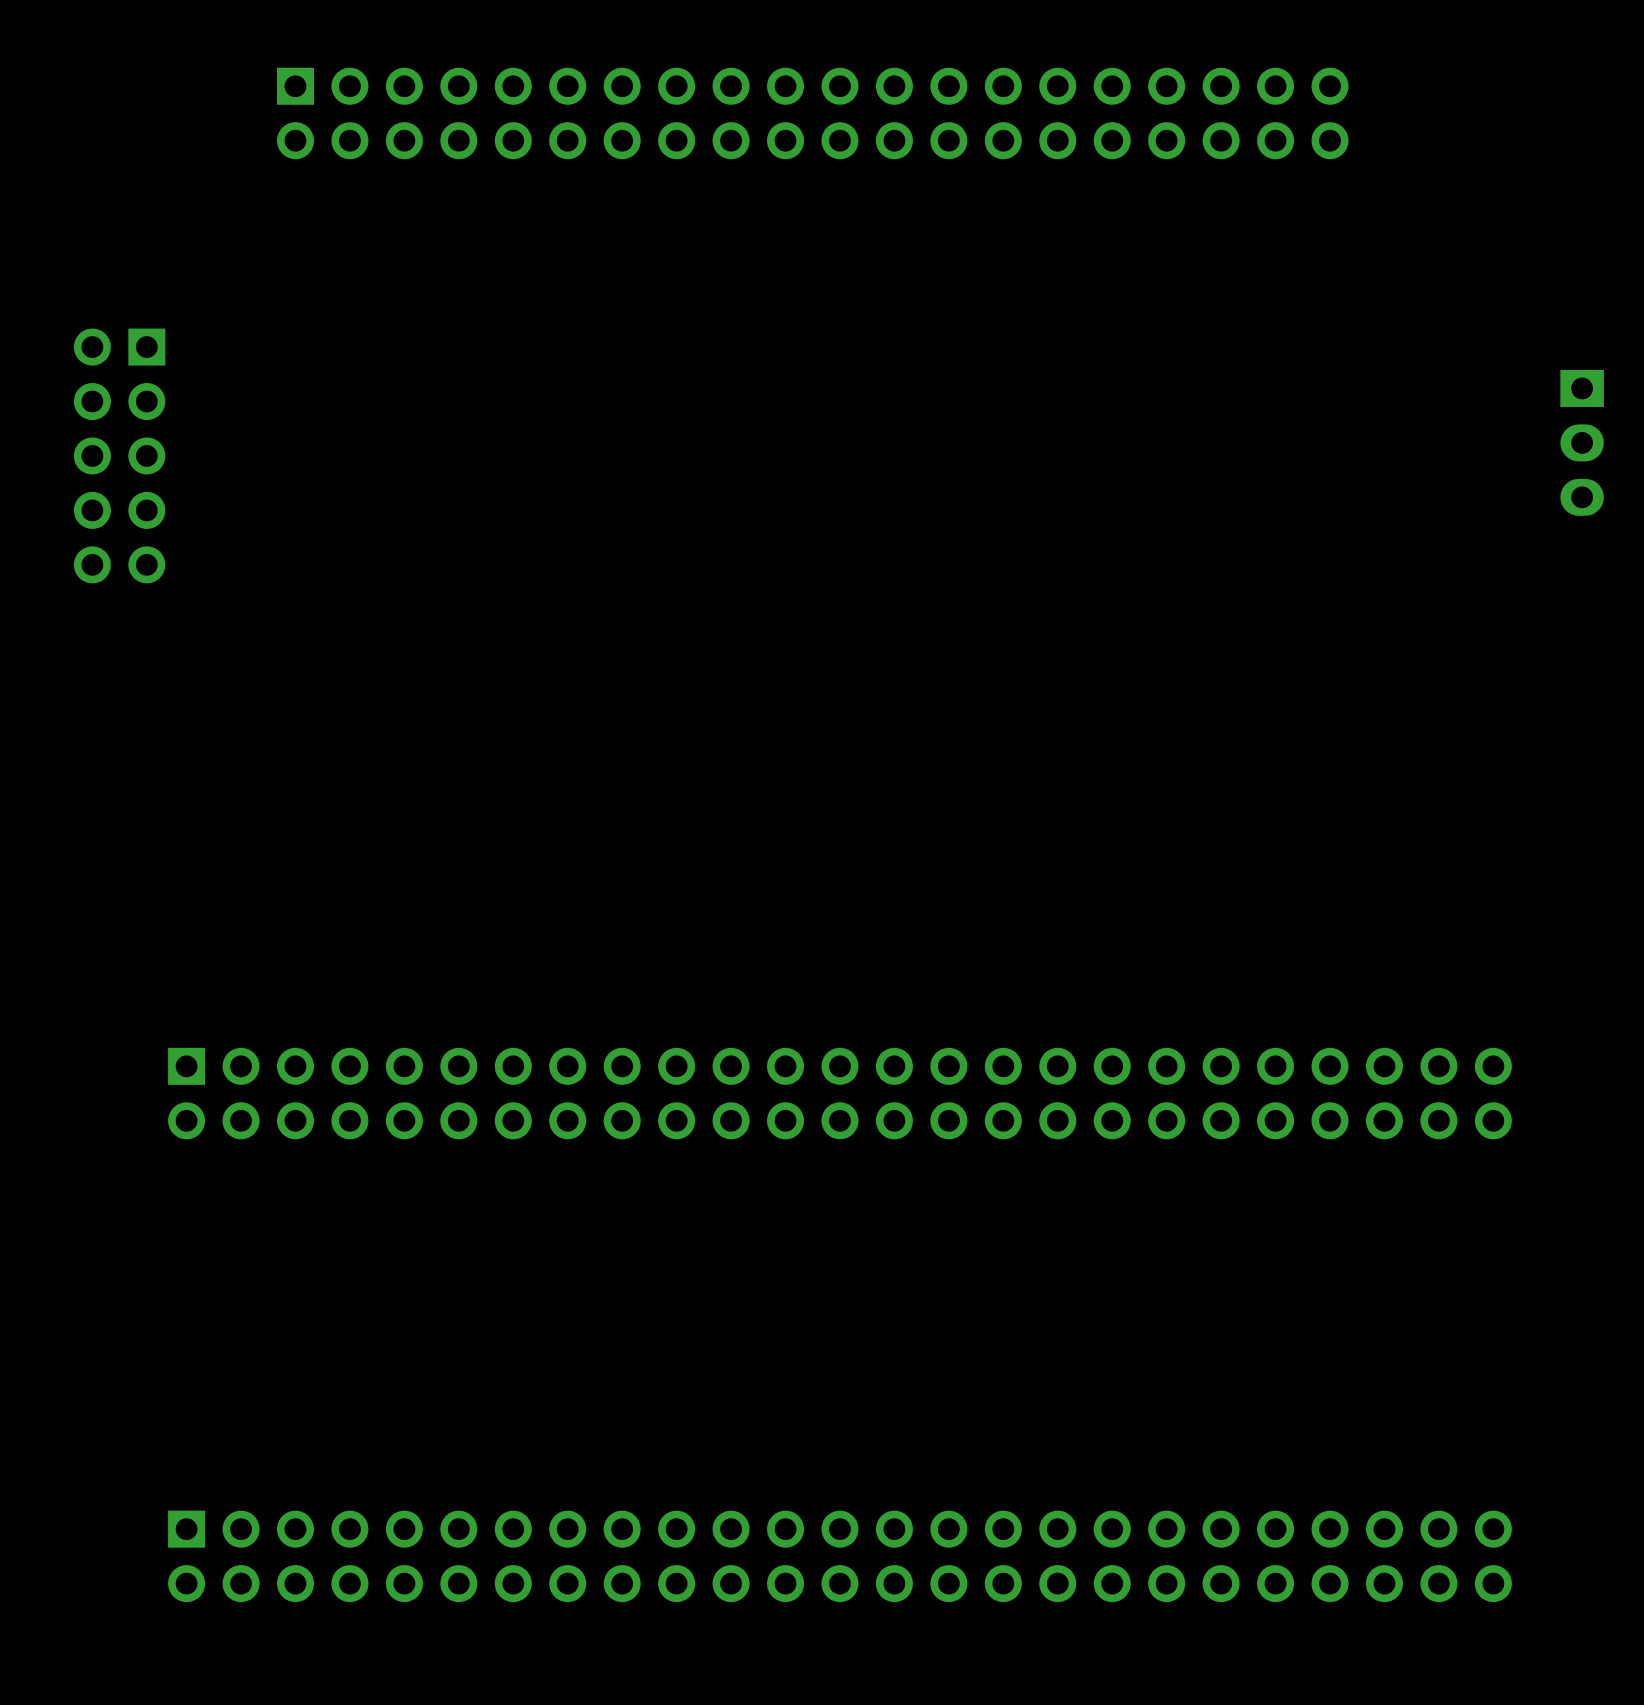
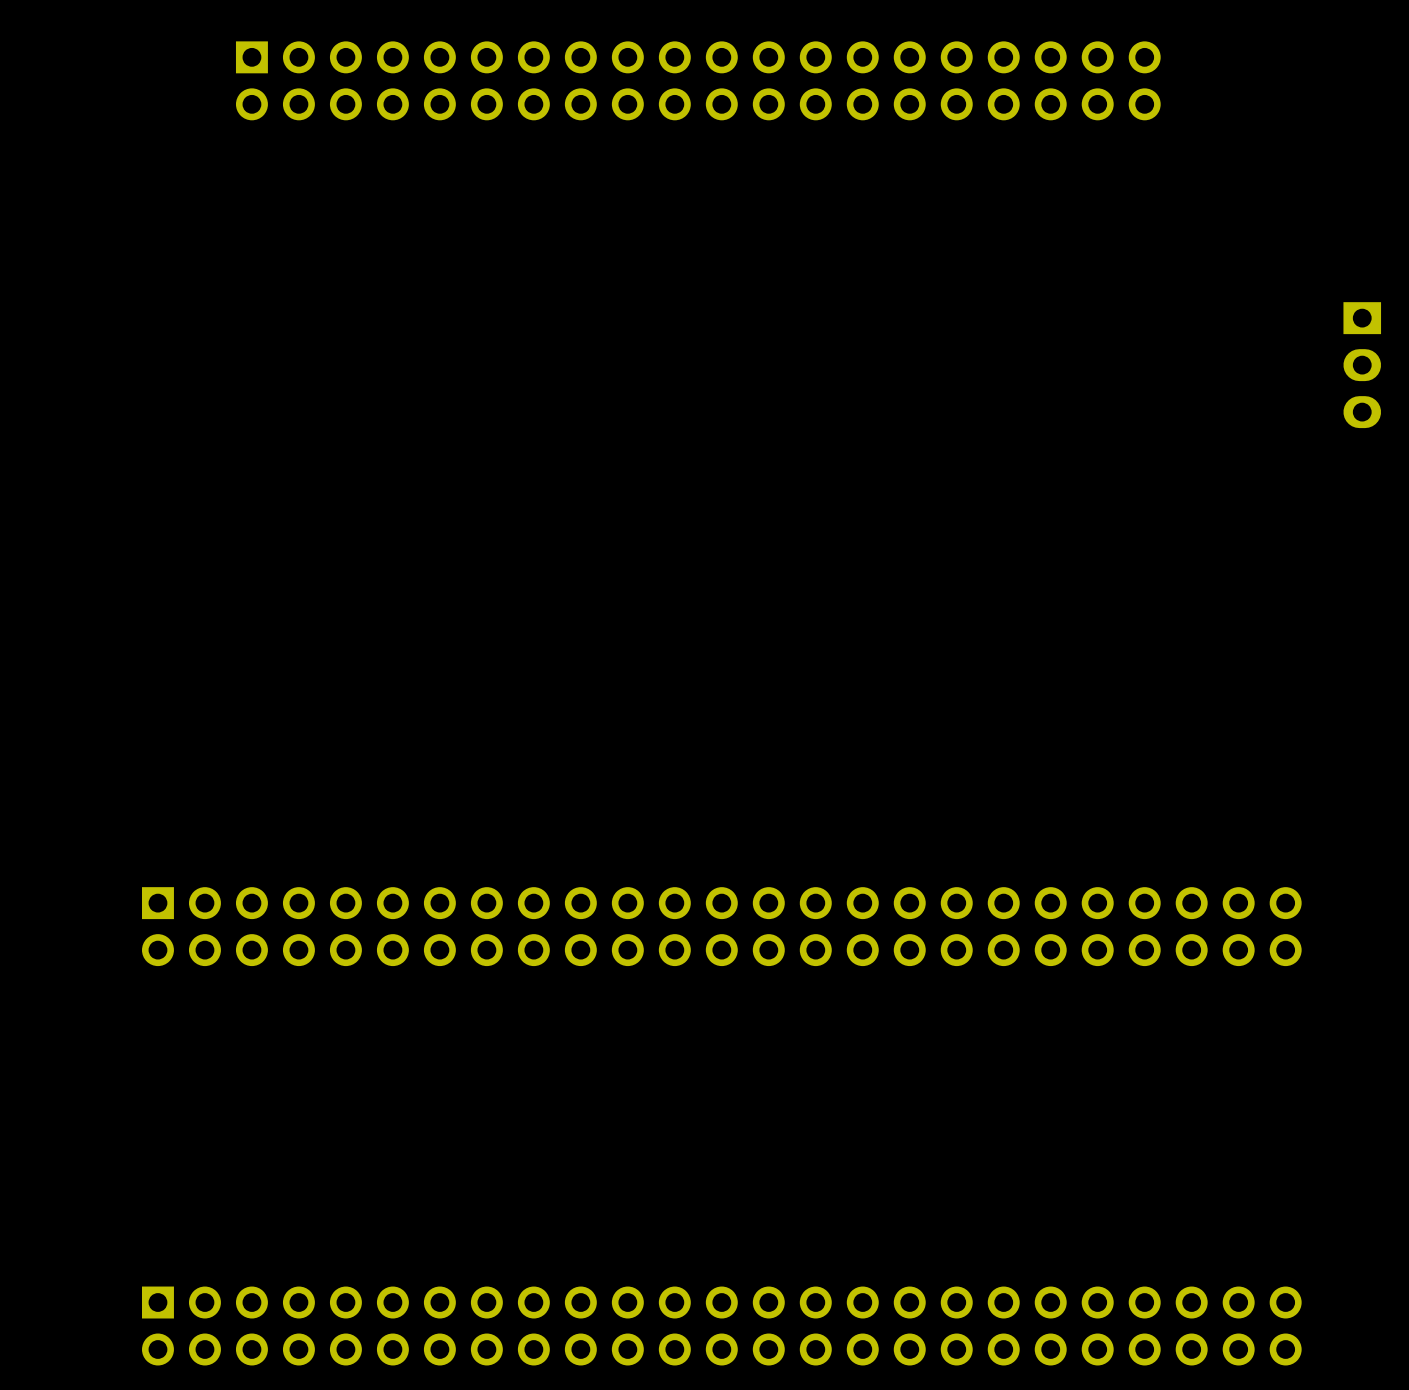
part: (119, 455) -> none

